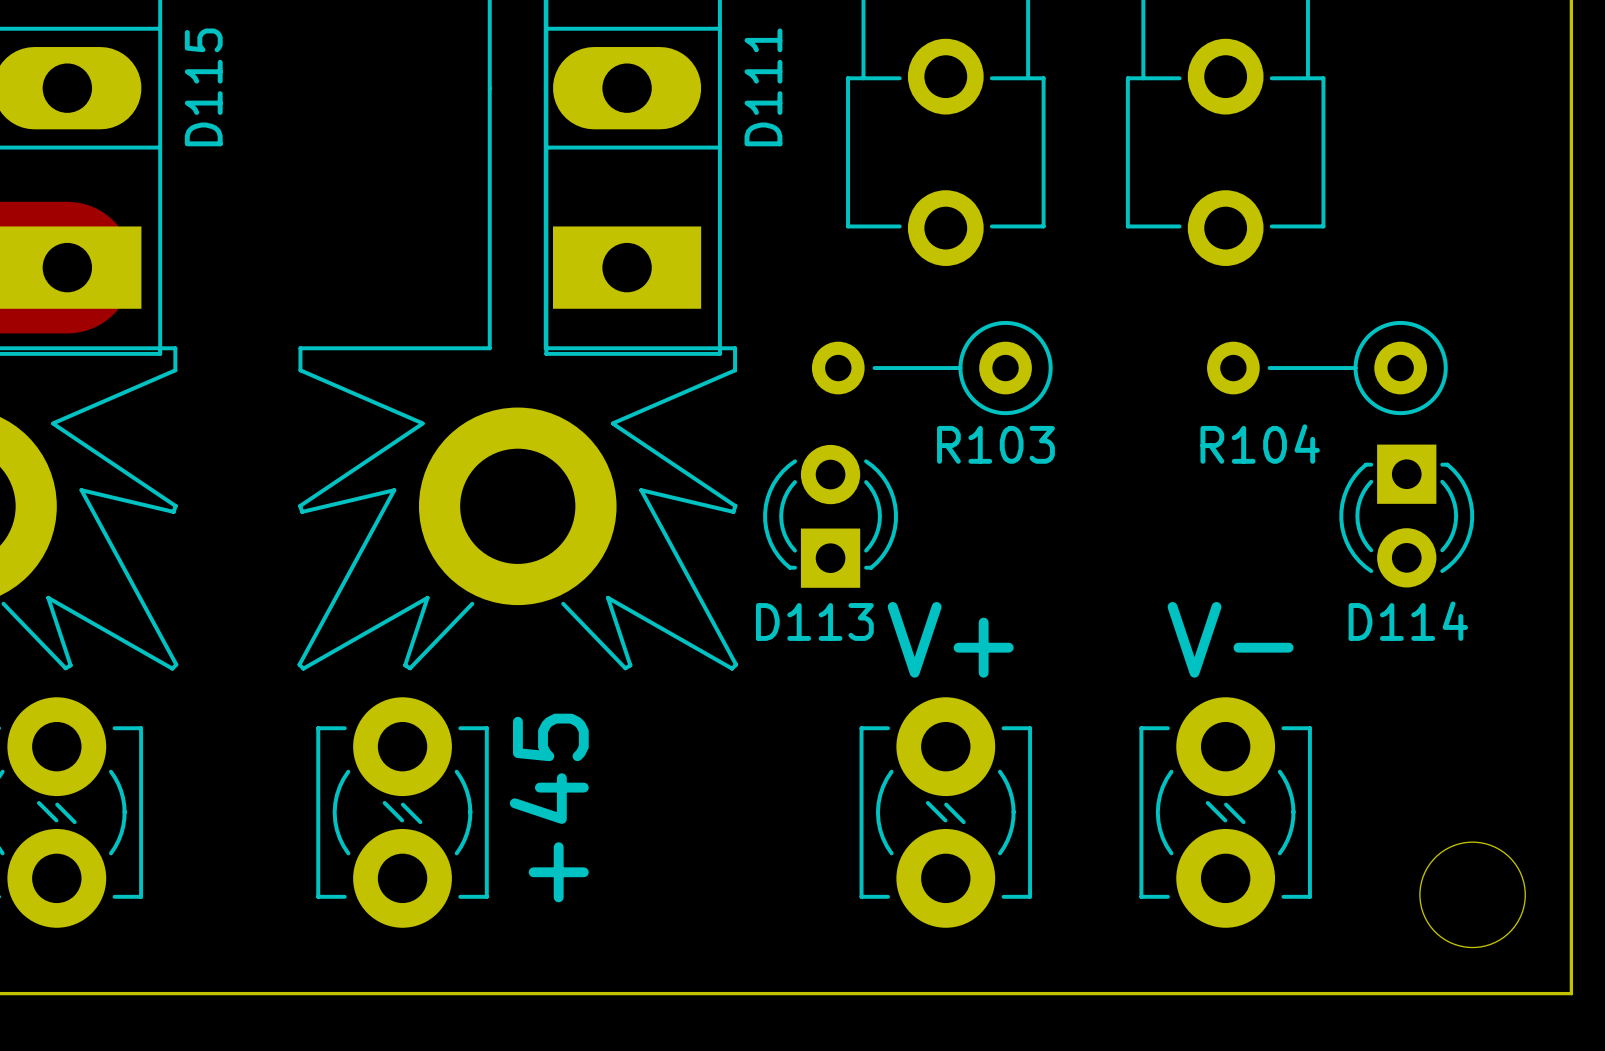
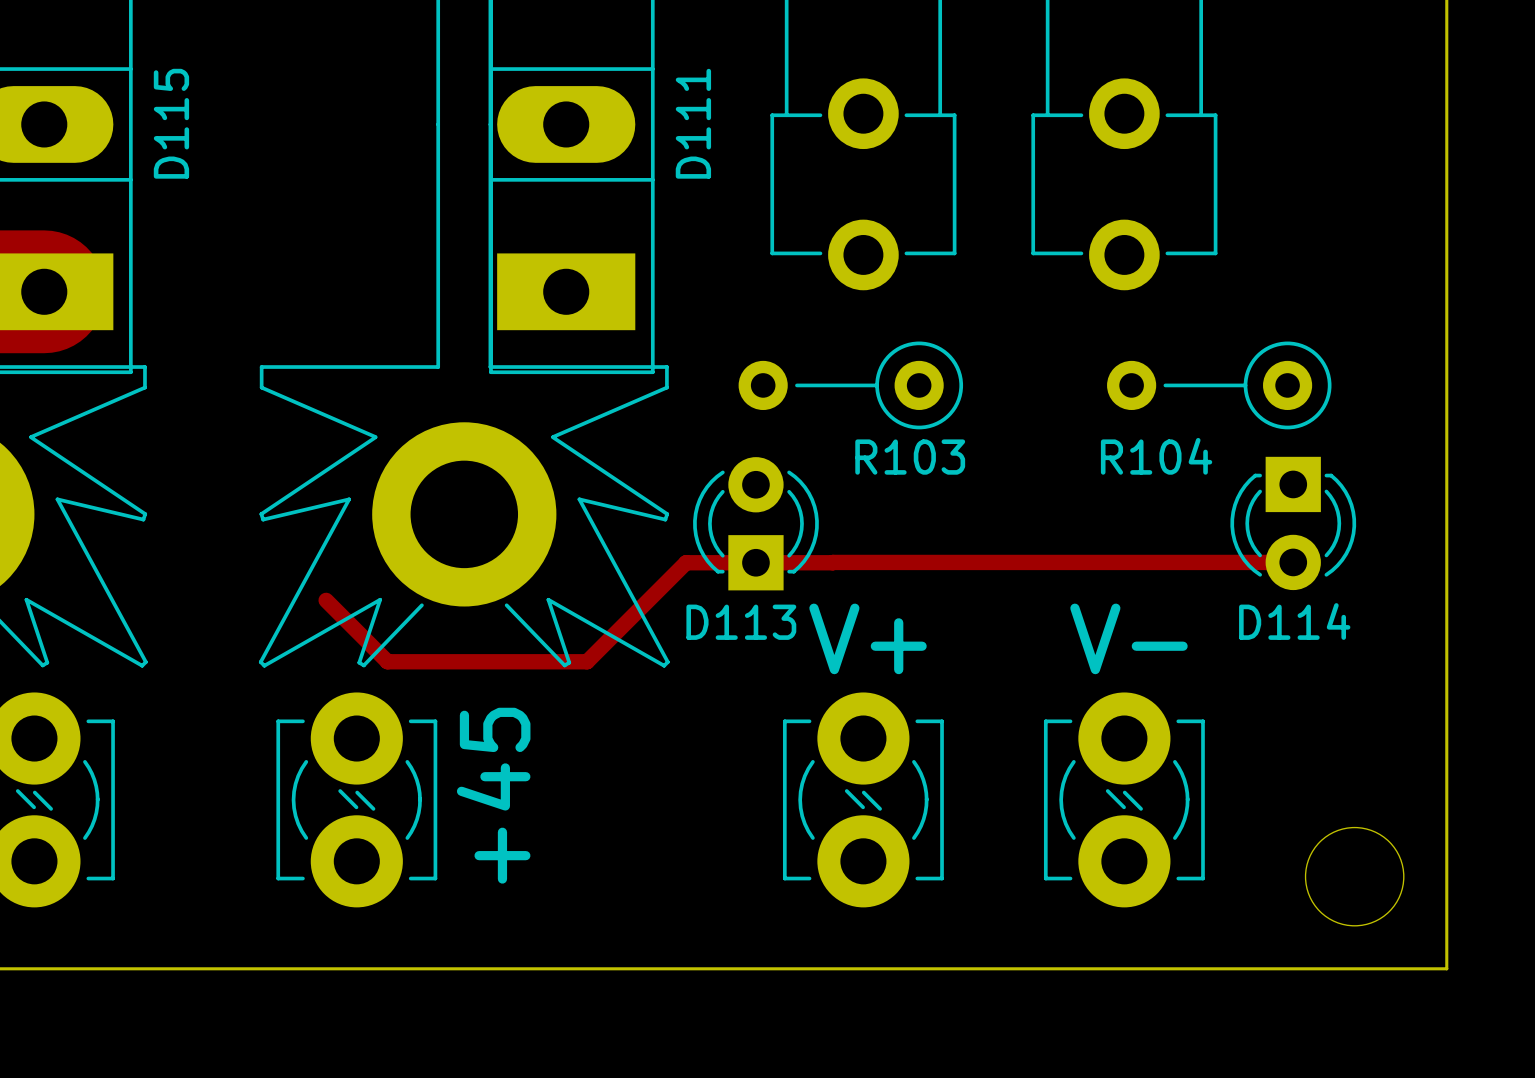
track: none -> (833, 562) (1293, 562)
track: none -> (832, 562) (686, 562) (587, 661) (387, 661) (326, 600)

